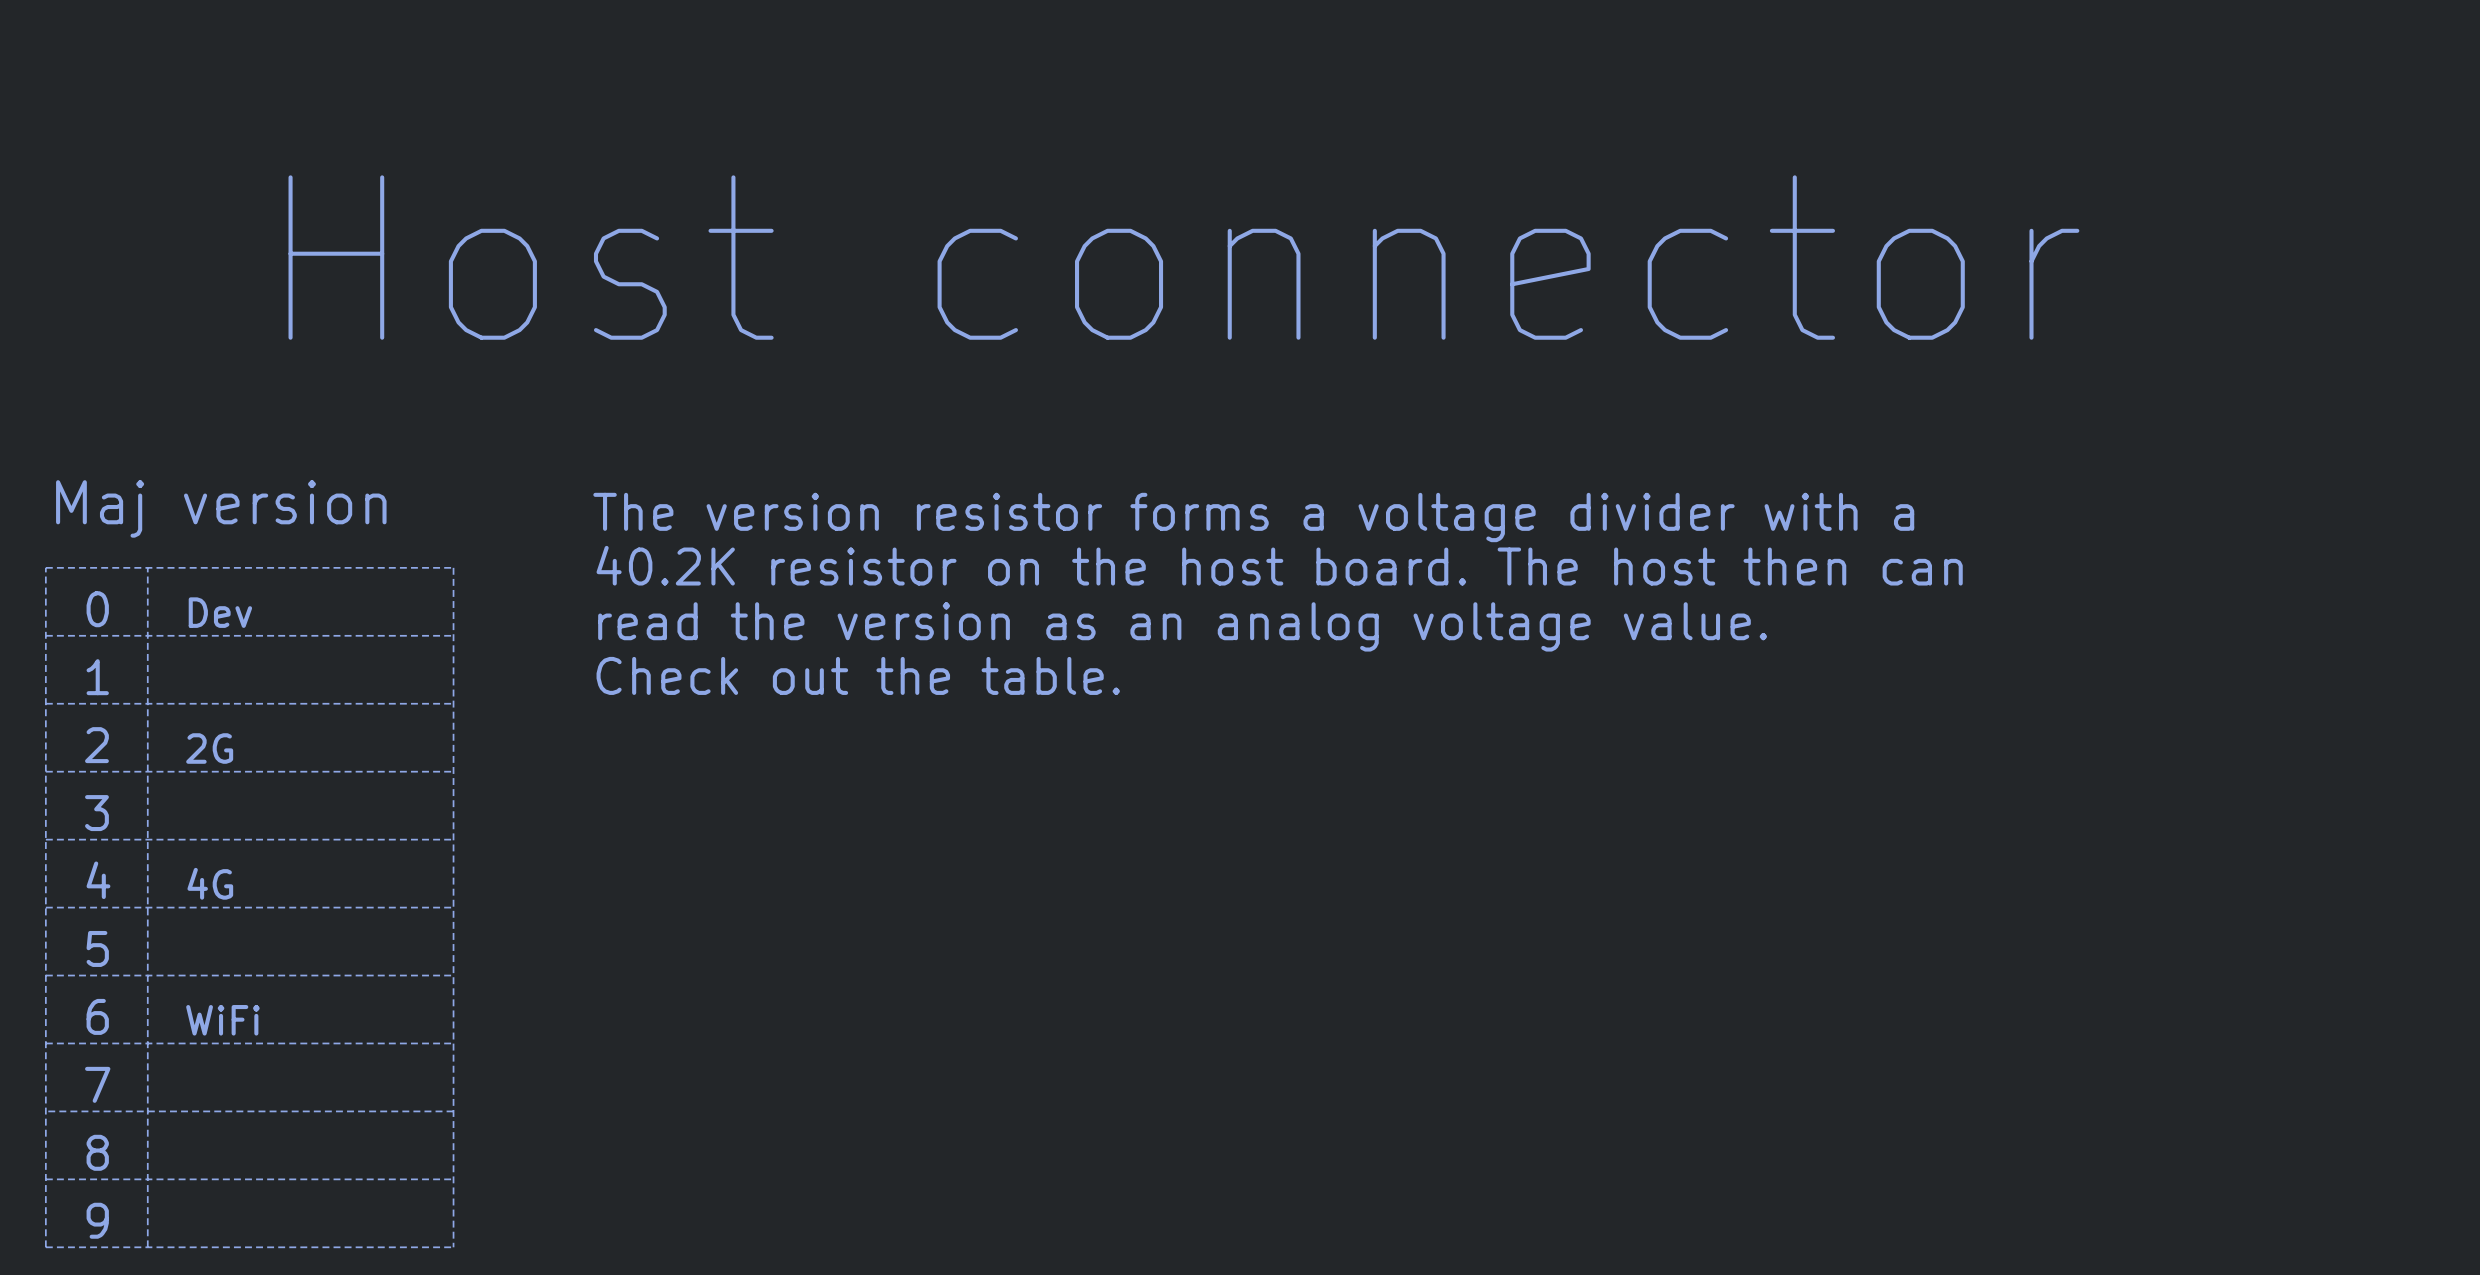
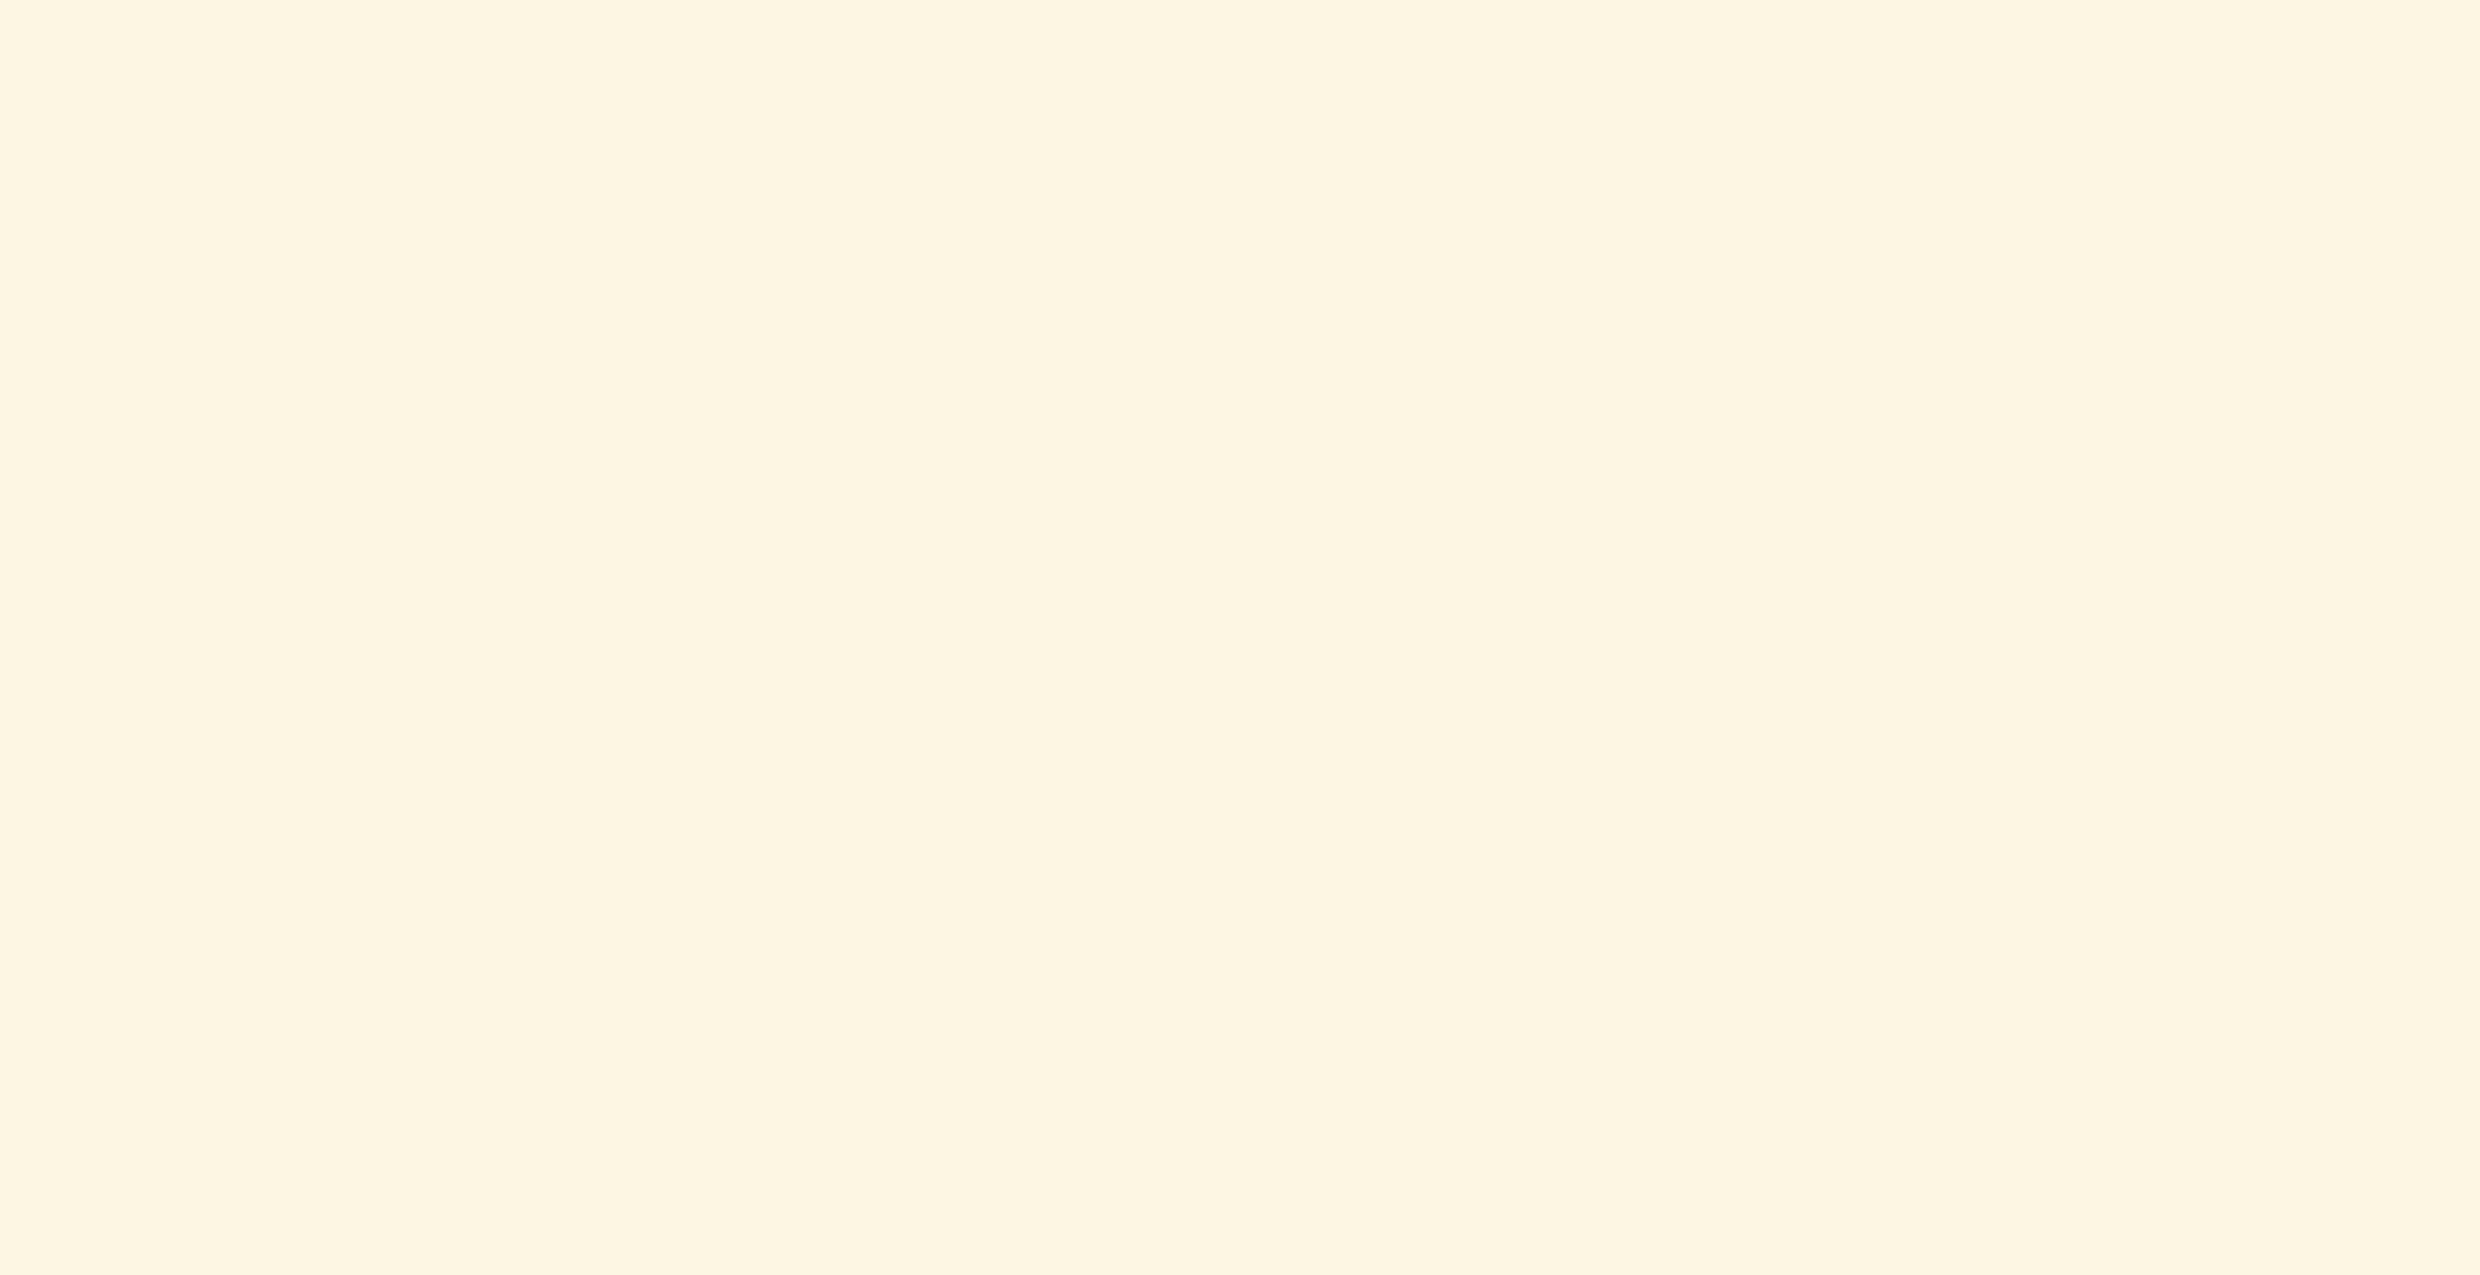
text: Host connector (1183, 257) -> none
text: Maj version (221, 508) -> none
text: The version resistor forms a voltage divider with a (1253, 517) -> none
text: 40.2K resistor on the host board. The host then can (1279, 565) -> none
line: (45, 567) (453, 567) (453, 1247) (45, 1247) (45, 567) -> none
line: (147, 567) (147, 1247) -> none
text: 0 (97, 609) -> none
text: Dev (220, 612) -> none
text: read the version as an analog voltage value. (1182, 626) -> none
line: (45, 635) (453, 635) -> none
text: Check out the table. (858, 675) -> none
text: 1 (97, 677) -> none
line: (45, 703) (453, 703) -> none
text: 2 (96, 745) -> none
text: 2G (209, 748) -> none
line: (45, 771) (453, 771) -> none
text: 3 (96, 813) -> none
line: (45, 839) (453, 839) -> none
text: 4 (98, 880) -> none
text: 4G (210, 883) -> none
line: (45, 907) (453, 907) -> none
text: 5 (97, 948) -> none
line: (45, 975) (453, 975) -> none
text: 6 (97, 1016) -> none
text: WiFi (222, 1020) -> none
line: (45, 1043) (453, 1043) -> none
text: 7 (97, 1084) -> none
line: (45, 1111) (453, 1111) -> none
text: 8 (97, 1152) -> none
line: (45, 1179) (453, 1179) -> none
text: 9 (97, 1220) -> none

